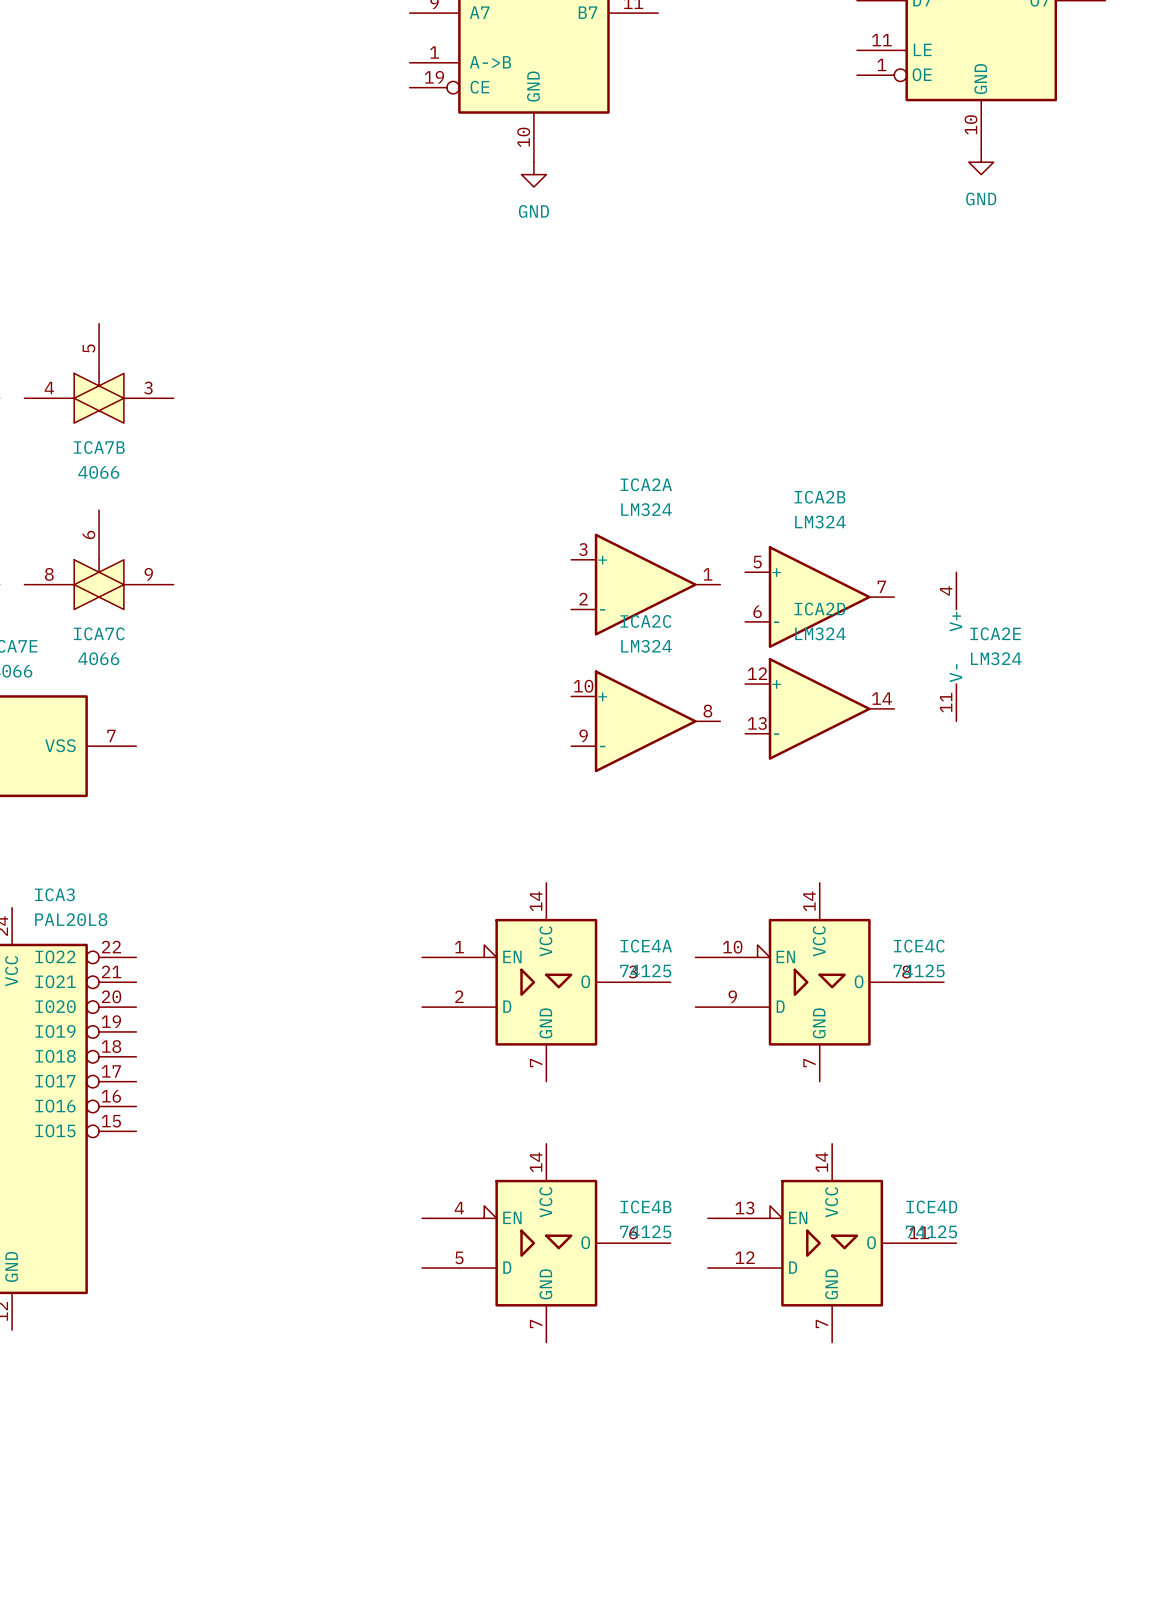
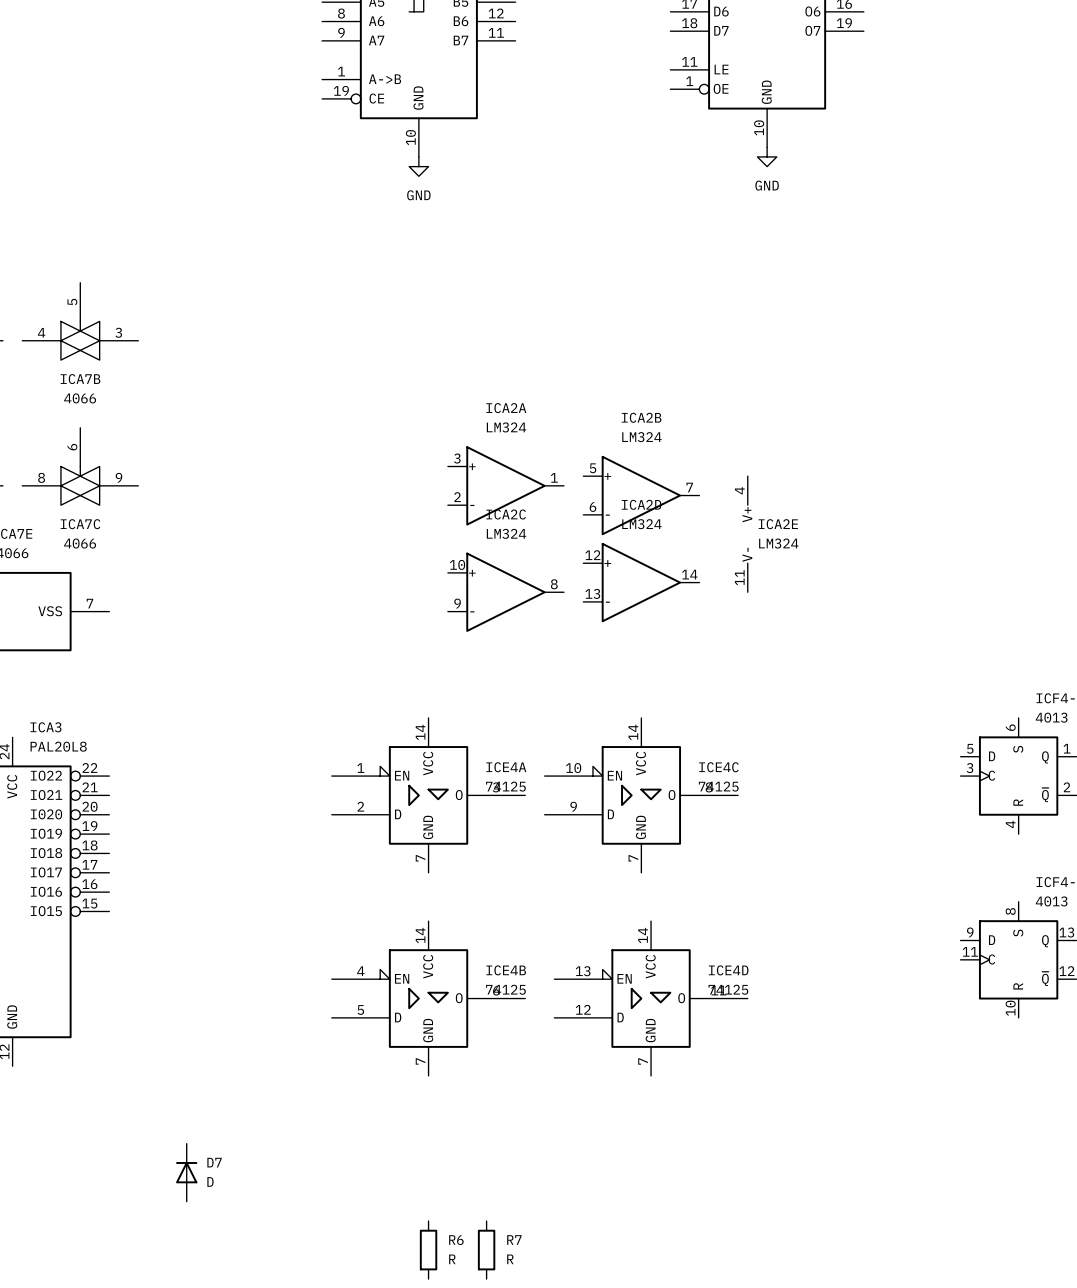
D7: none -> D (186, 1172)
R6: none -> R (428, 1250)
R7: none -> R (486, 1250)

